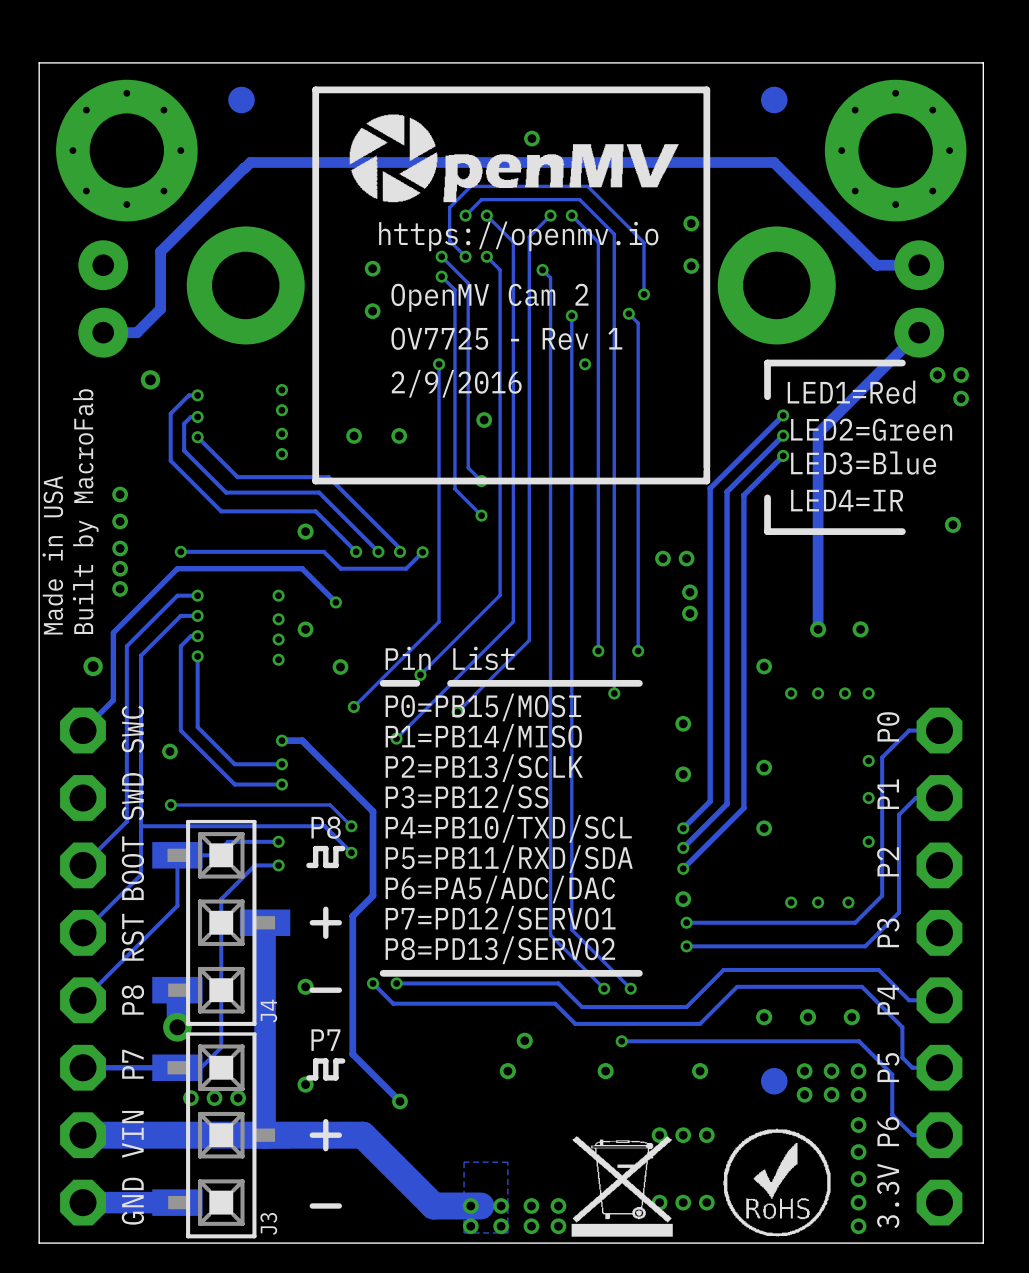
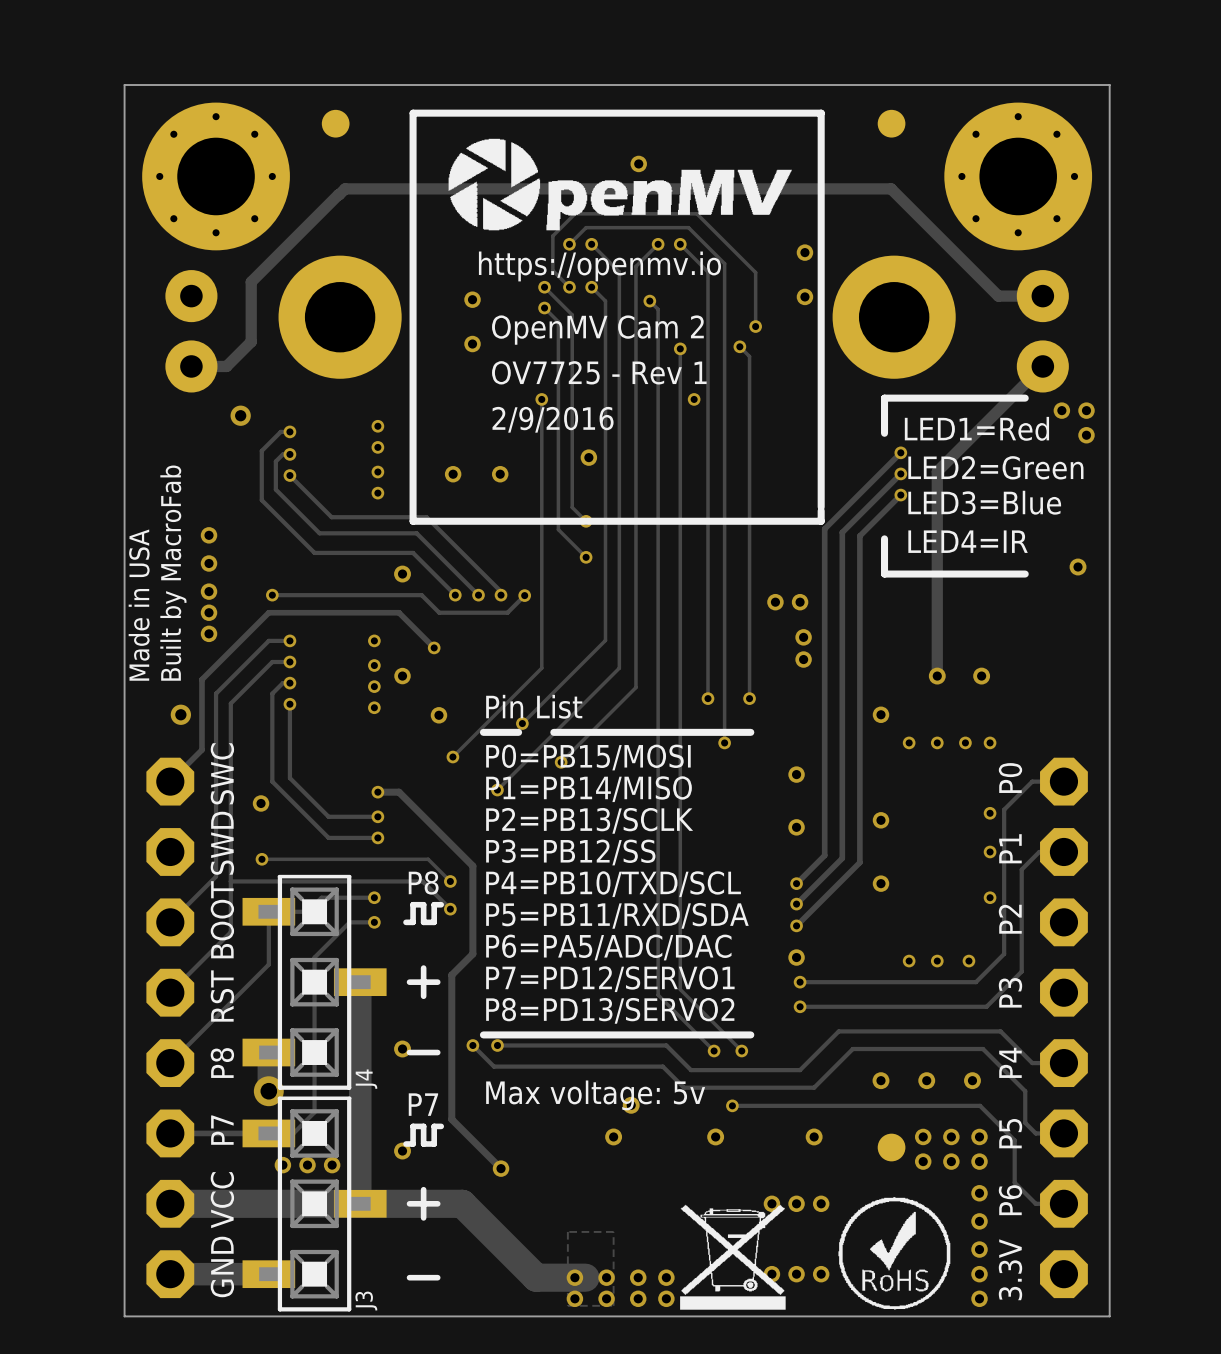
text: none -> Max voltage: 5v (595, 1095)
text: VIN (132, 1134) -> VCC (222, 1200)

